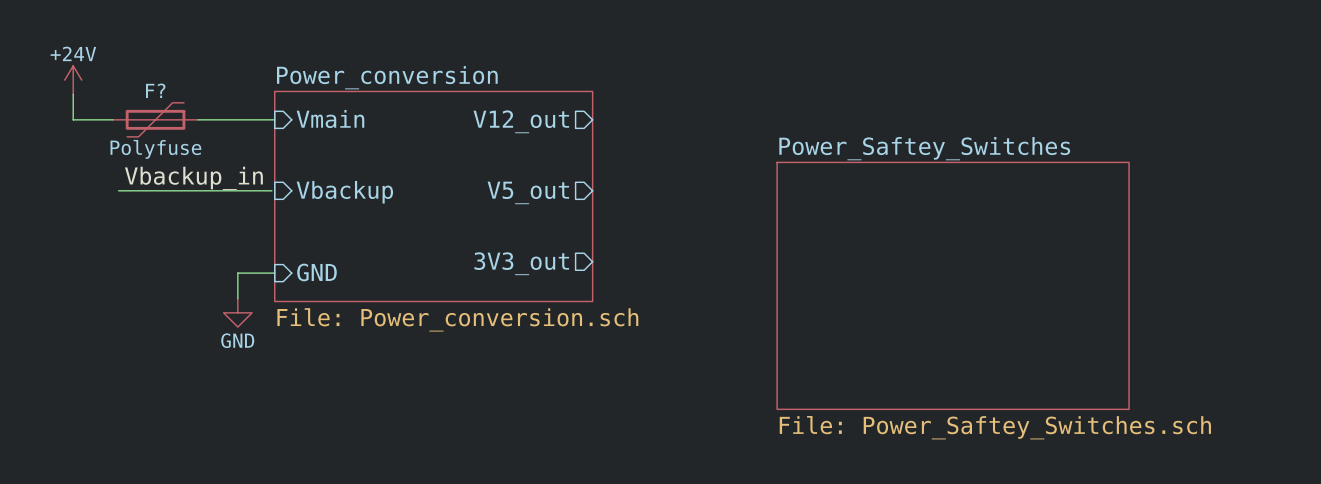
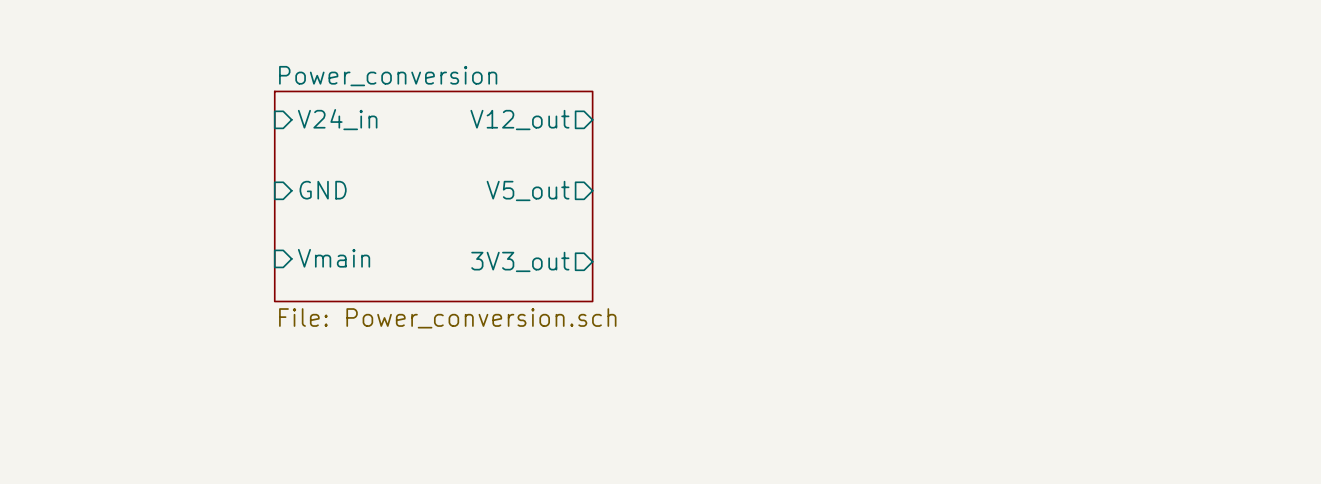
power symbol: +24V (73, 80) -> none
wire: (73, 94) (73, 119) (112, 119) -> none
F?: Polyfuse (155, 119) -> none
wire: (198, 119) (274, 119) -> none
sheet pin: Vmain (330, 119) -> V24_in (337, 119)
label: Vbackup_in (193, 178) -> none
wire: (118, 190) (271, 190) -> none
sheet pin: Vbackup (344, 192) -> GND (323, 190)
sheet pin: none -> Vmain (334, 258)
sheet pin: GND (316, 272) -> none
wire: (274, 273) (237, 273) (237, 298) -> none
sheet Power_Saftey_Switches: File: Power_Saftey_Switches.sch (953, 285) -> none
power symbol: GND (237, 312) -> none

